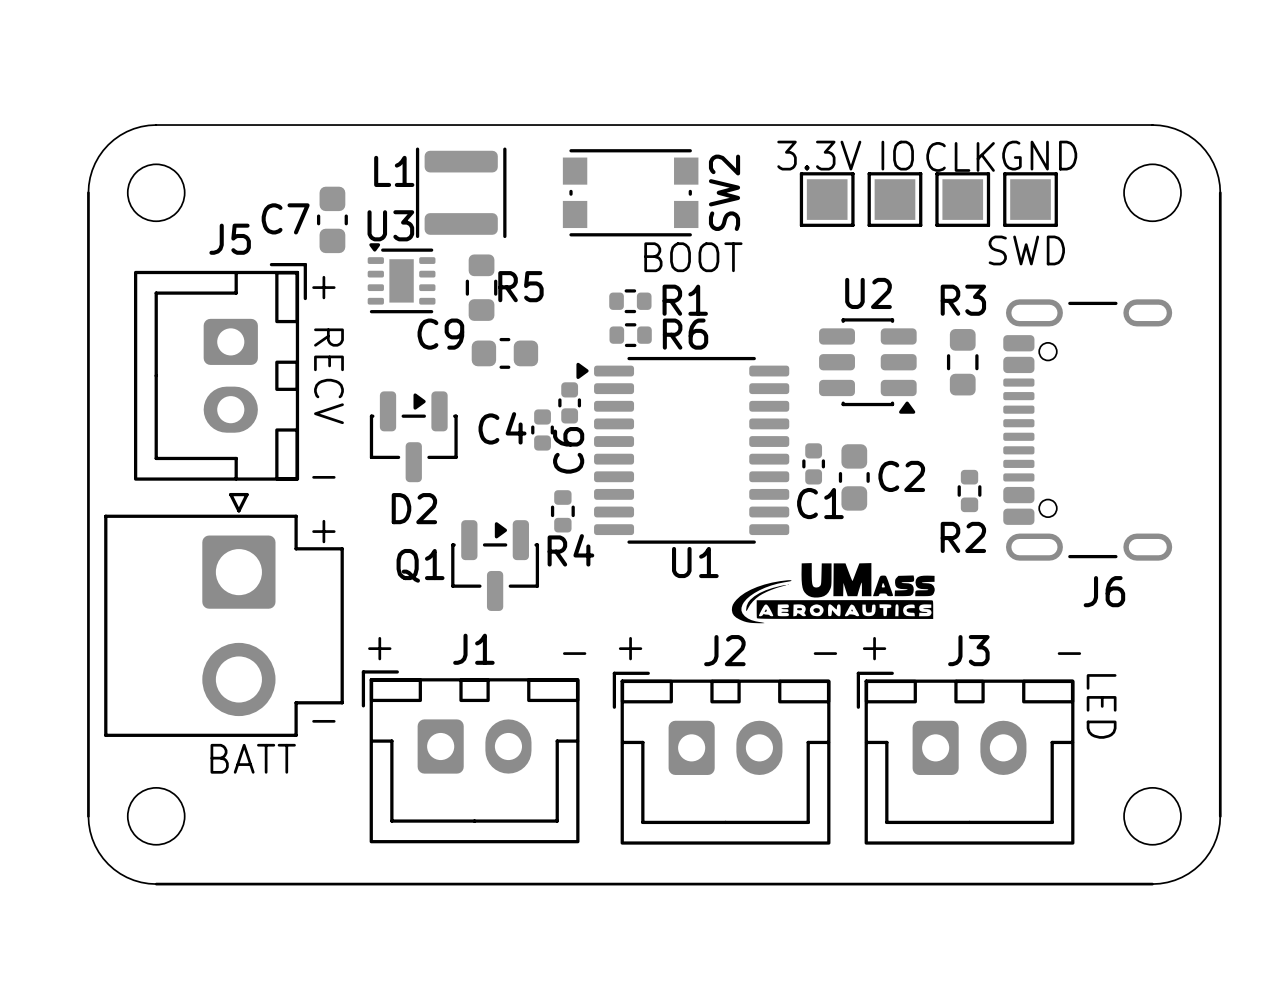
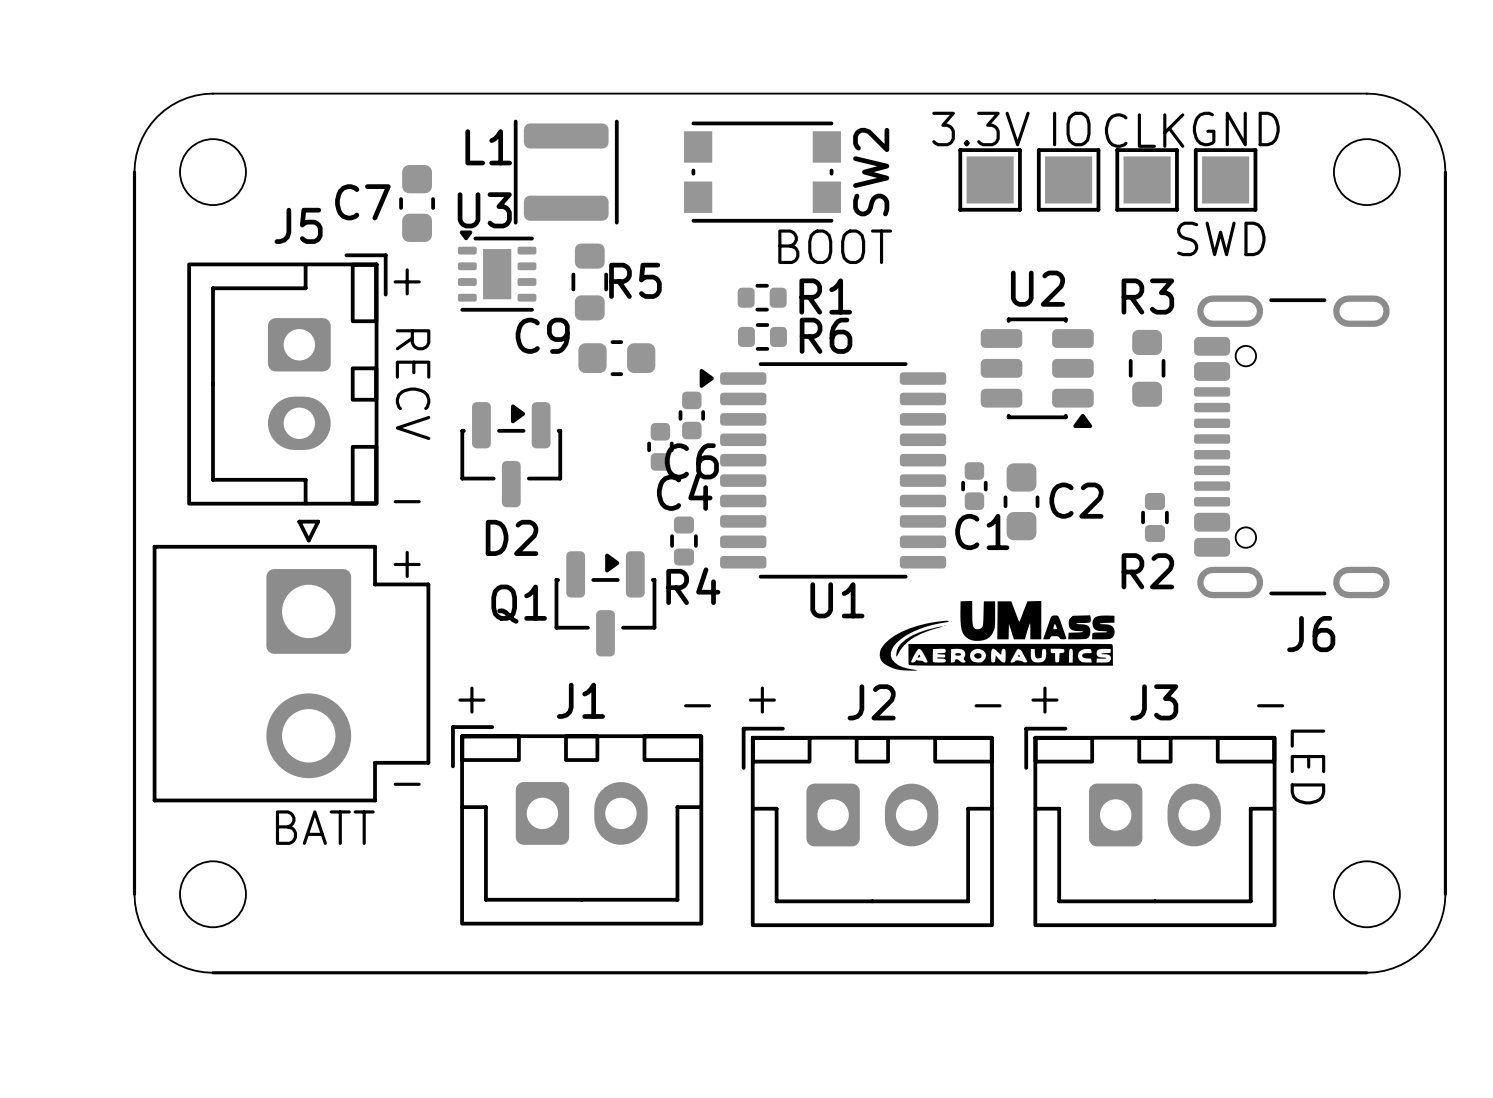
C4 name position: C4 (502, 428) -> C4 (684, 492)
C6 name rotation: 0° (568, 450) -> 90° clockwise (691, 461)

